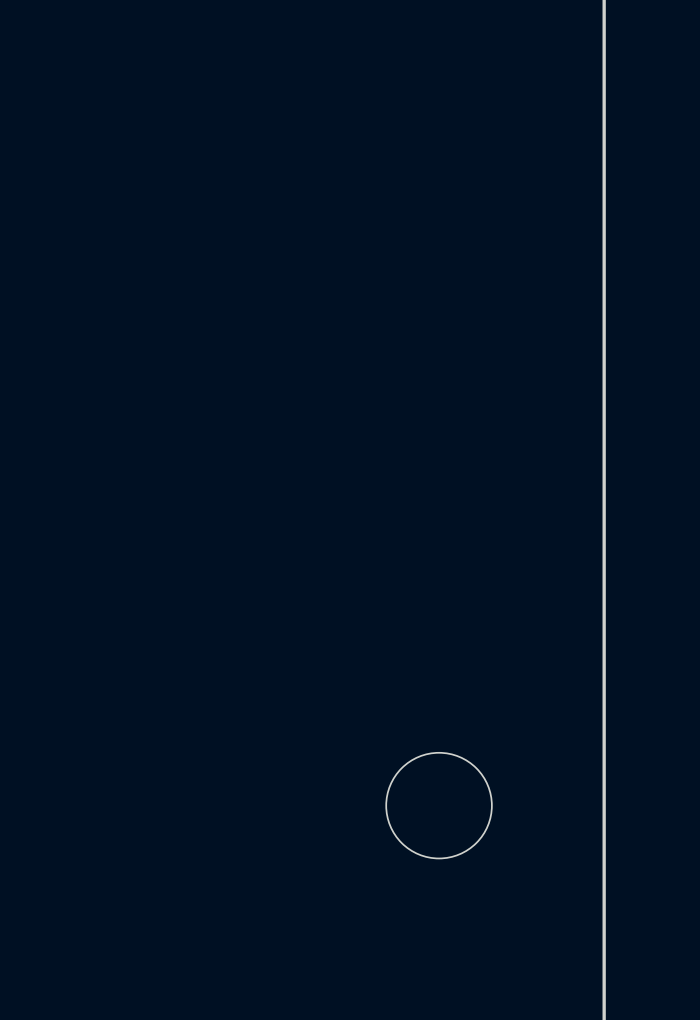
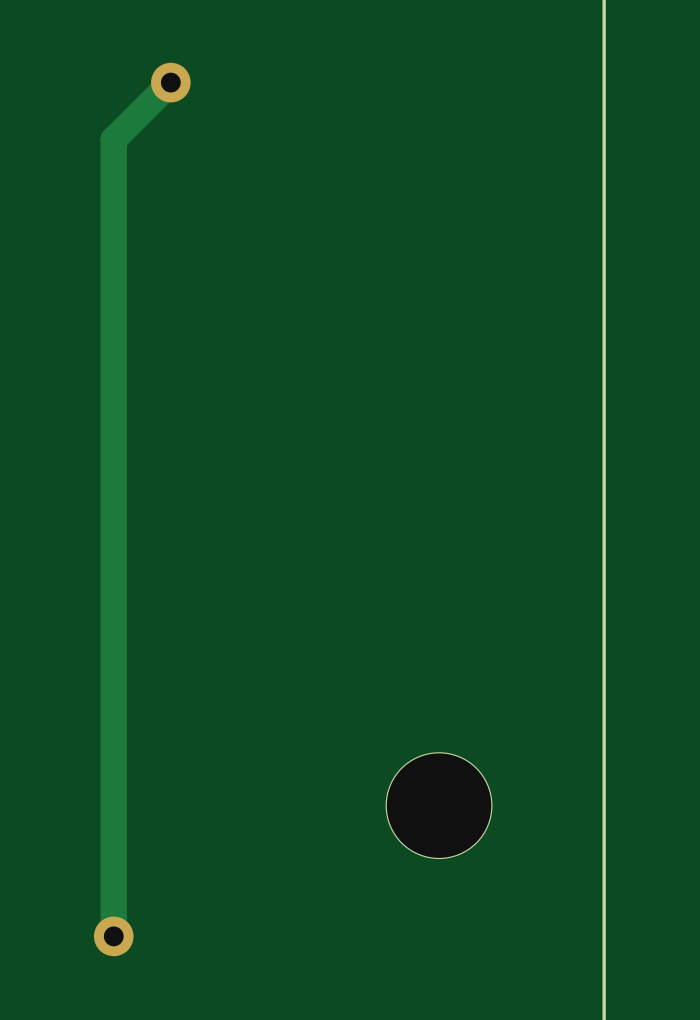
track: none -> (170, 82) (113, 139) (113, 936)
via: none -> (170, 82)
via: none -> (113, 936)

